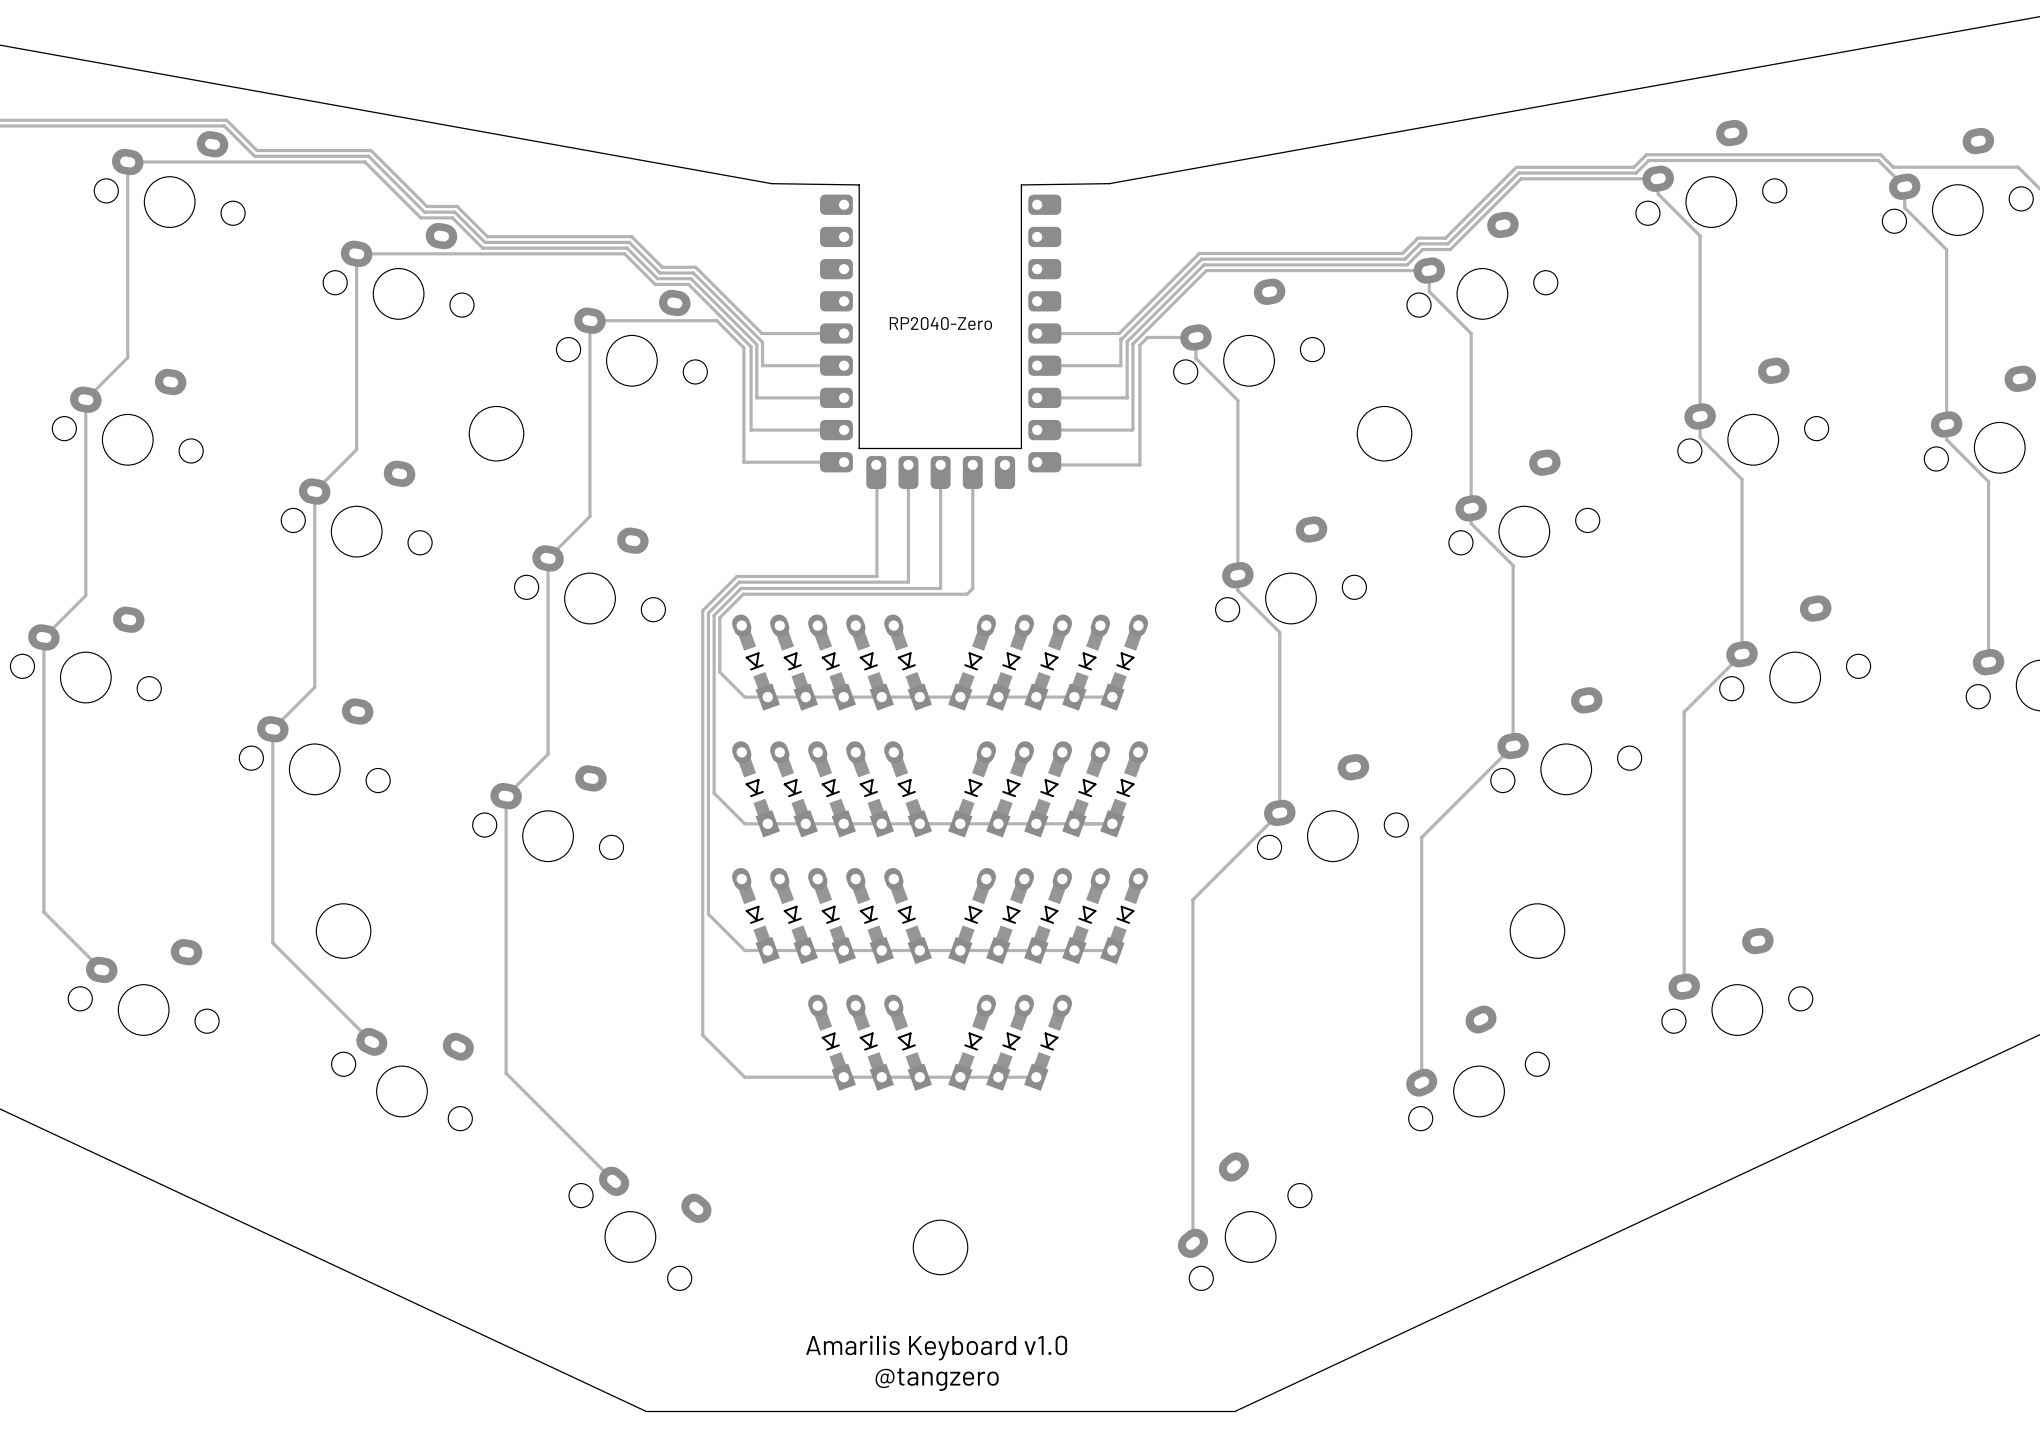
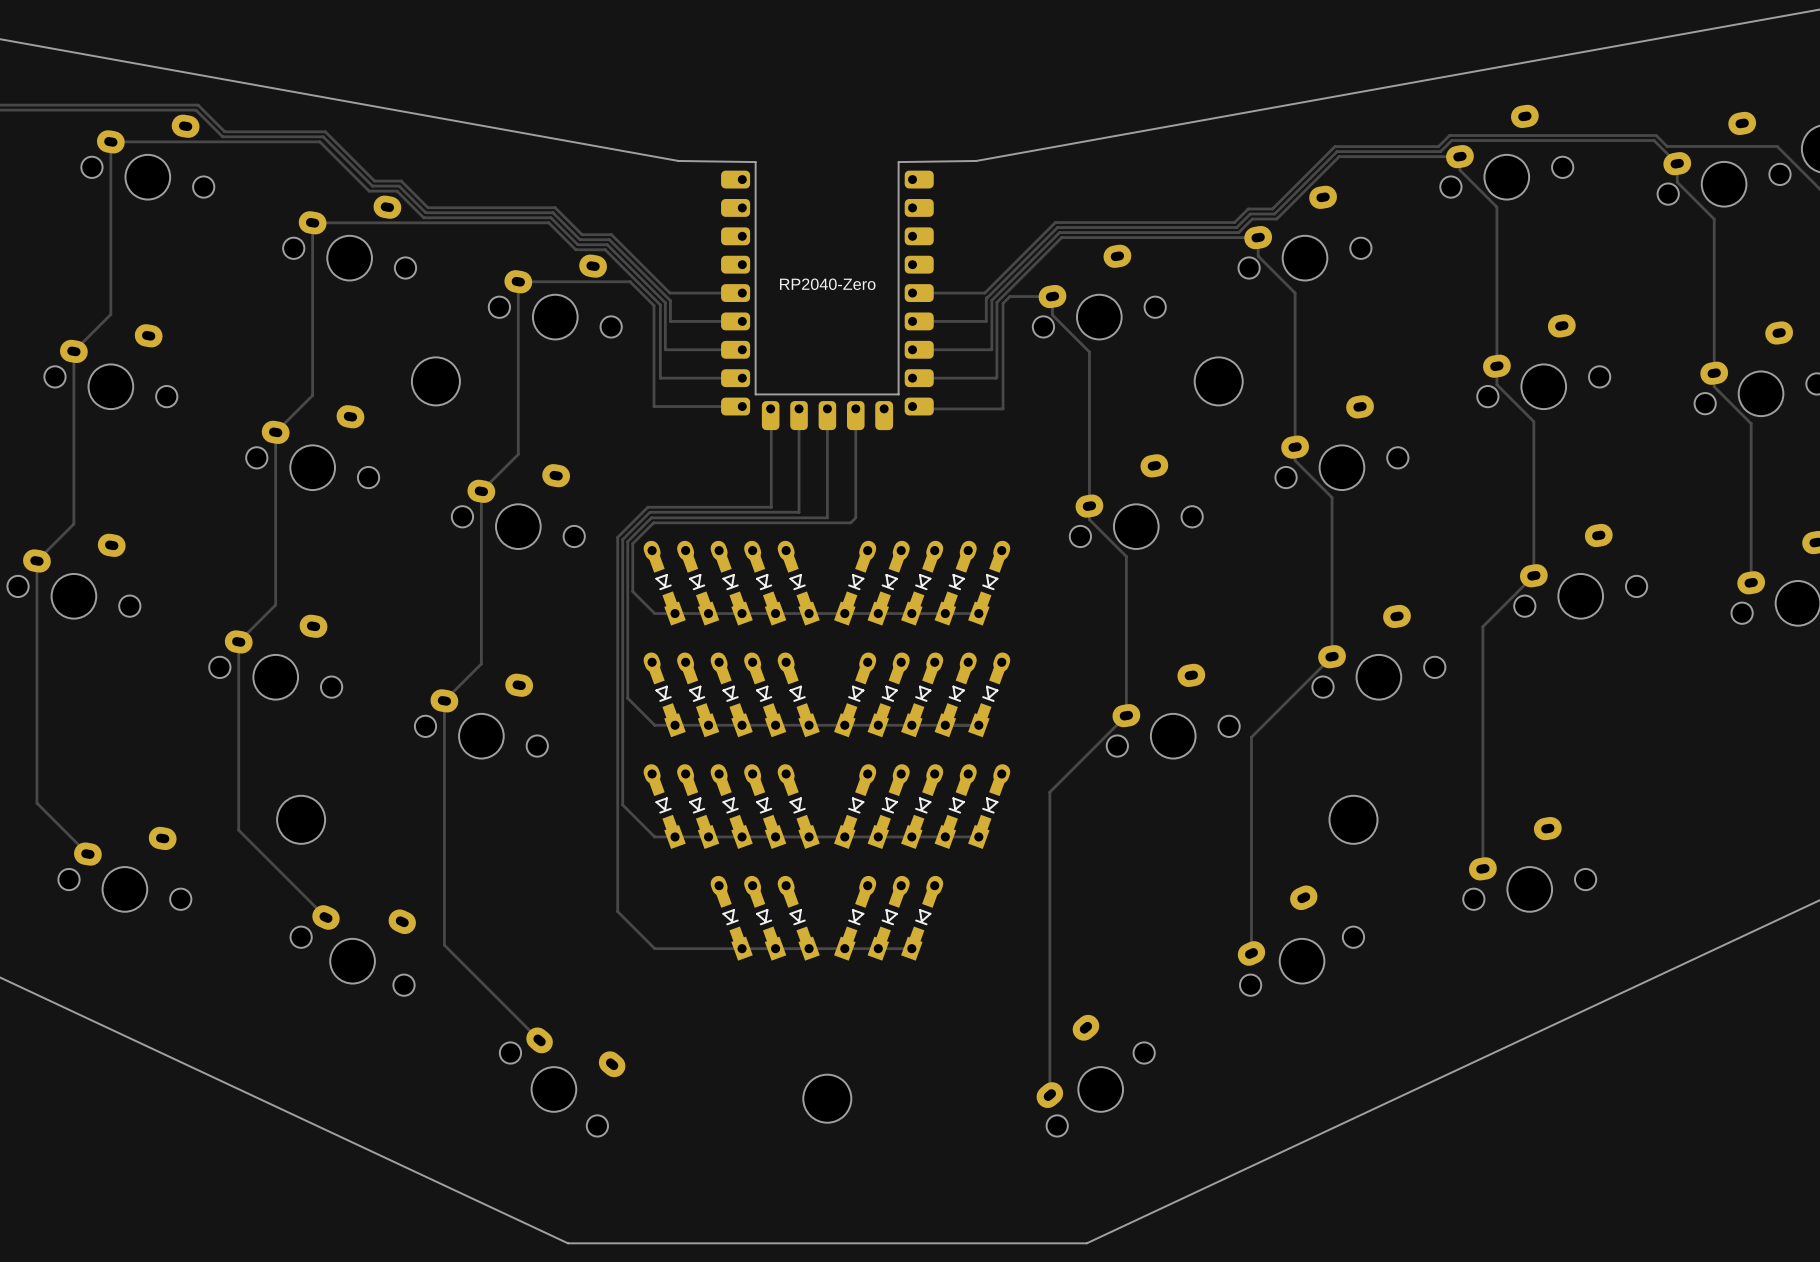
text: Amarilis Keyboard v1.0 (936, 1348) -> none
text: @tangzero (937, 1379) -> none

